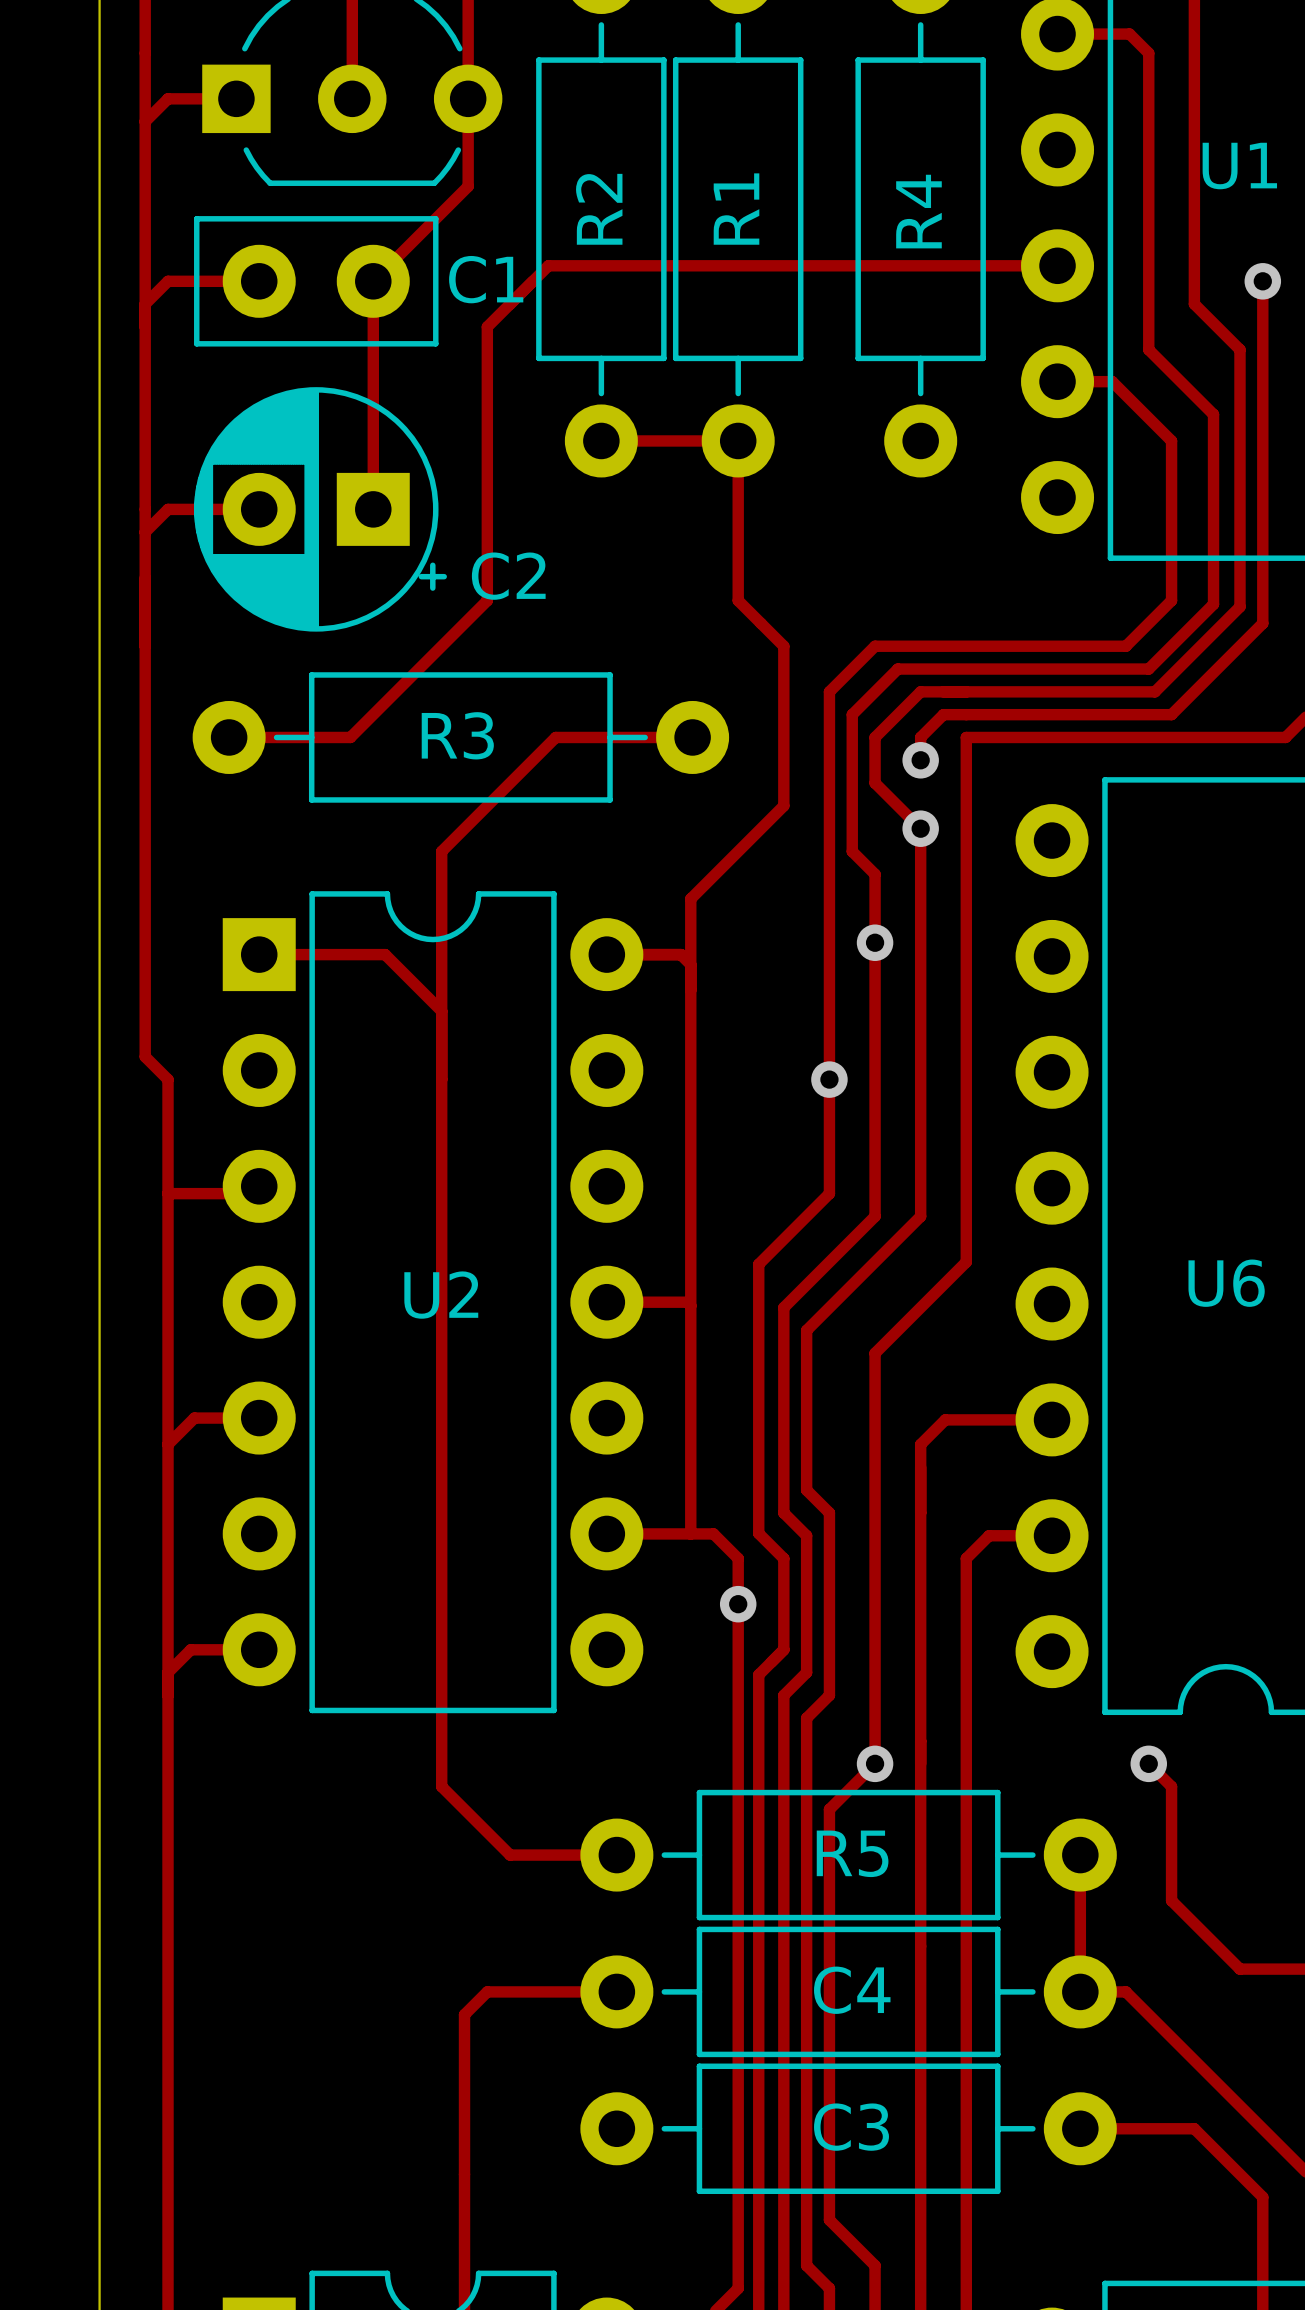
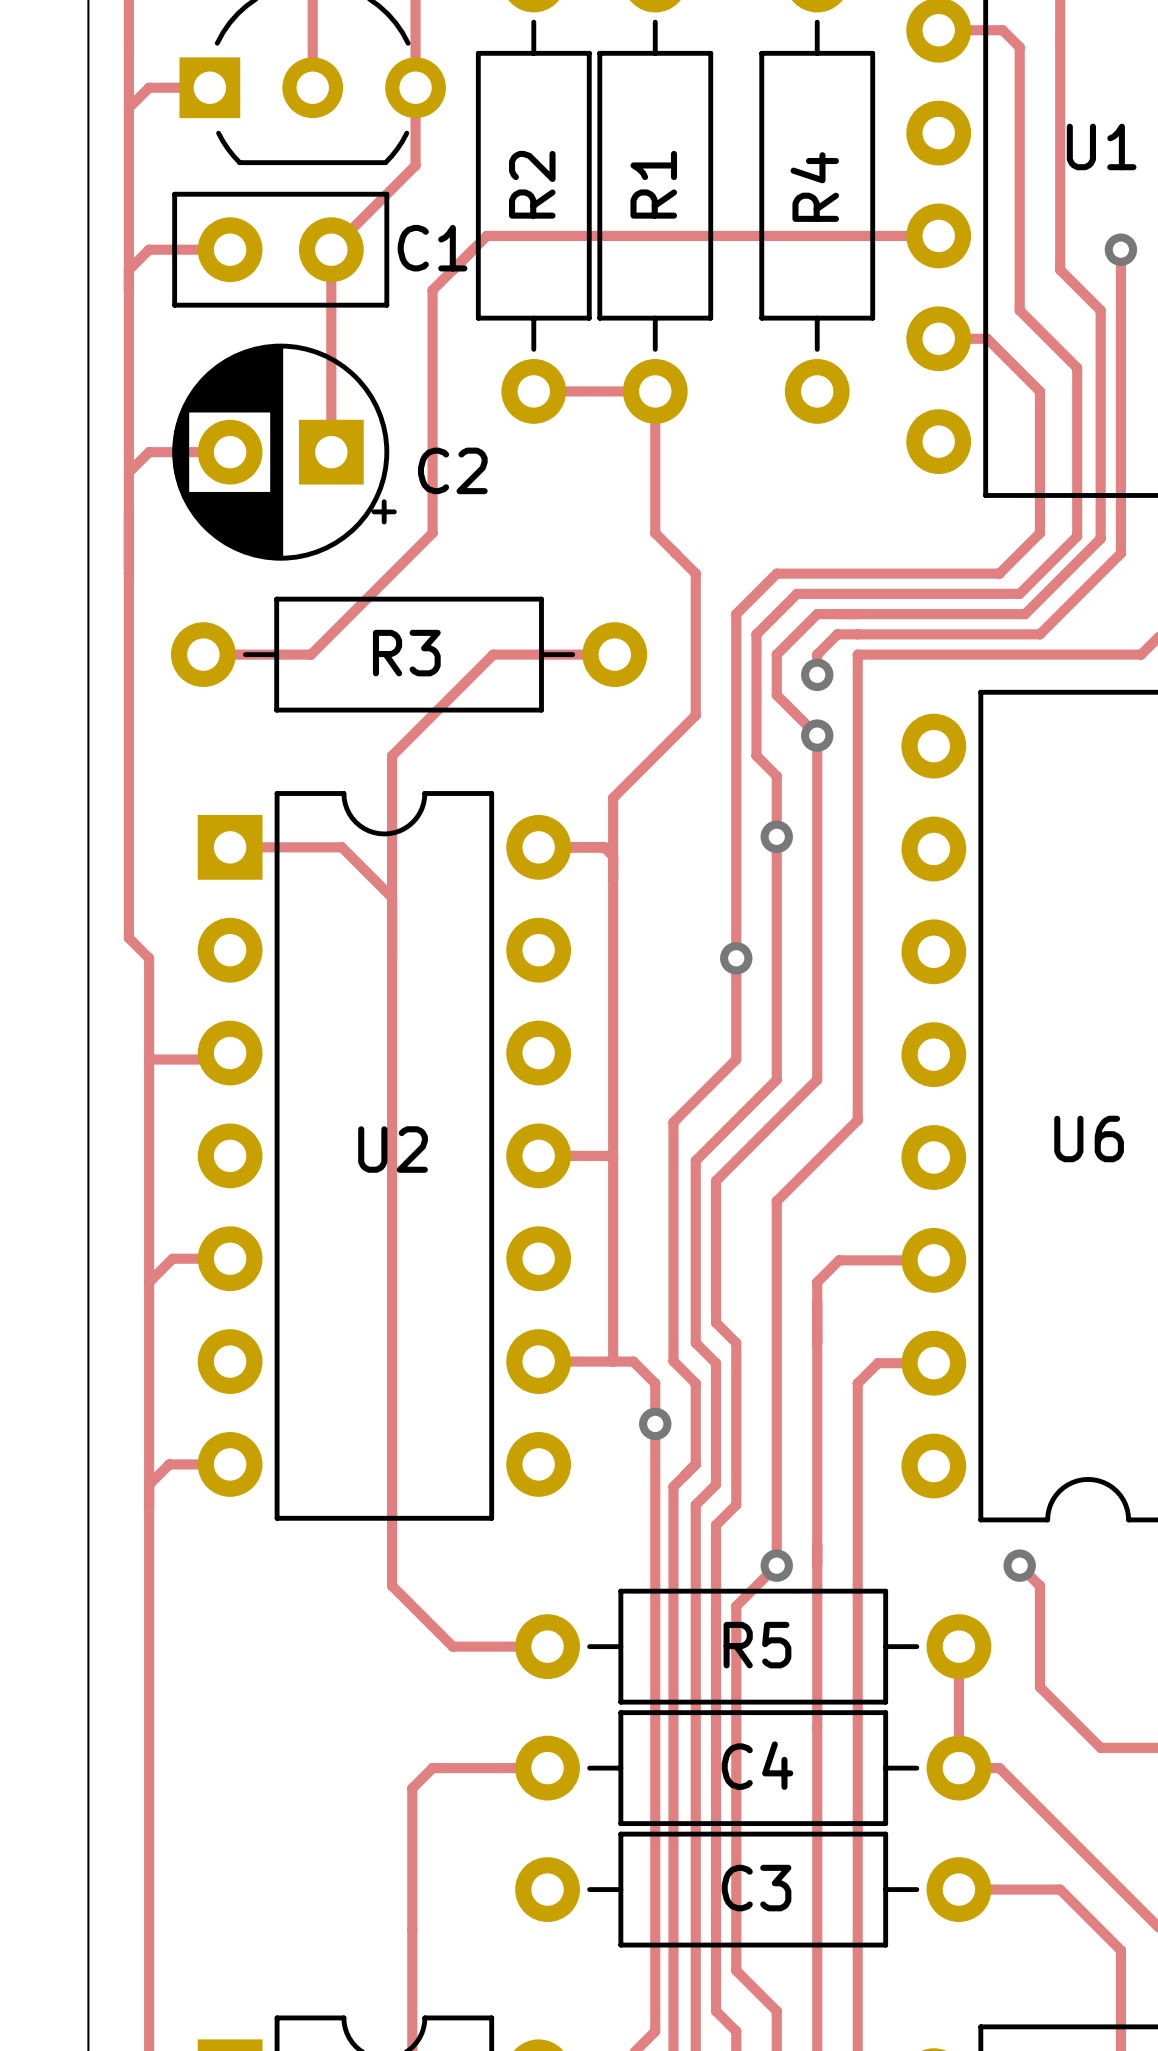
C2 name position: C2 (508, 576) -> C2 (452, 470)

